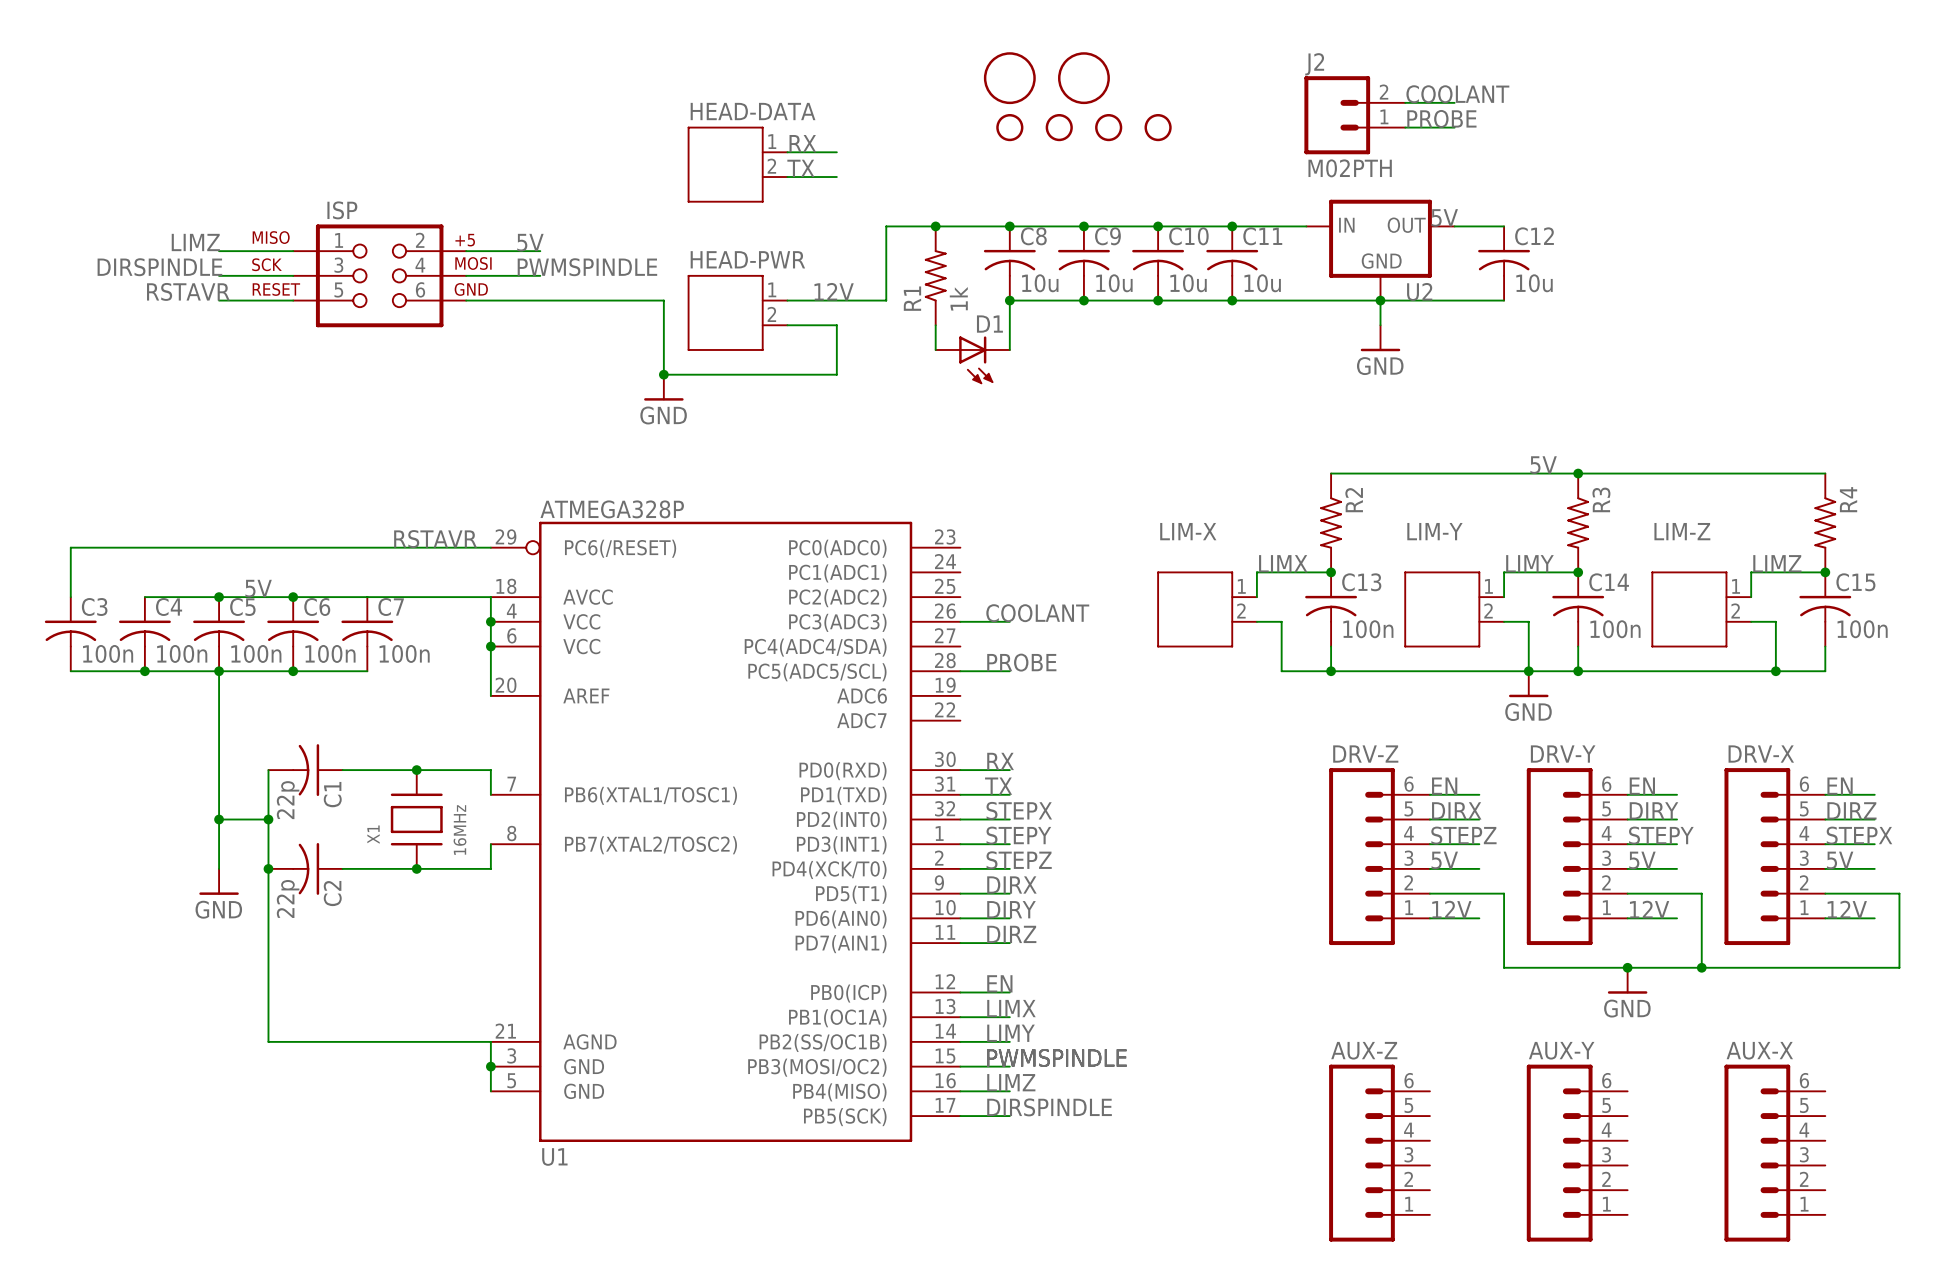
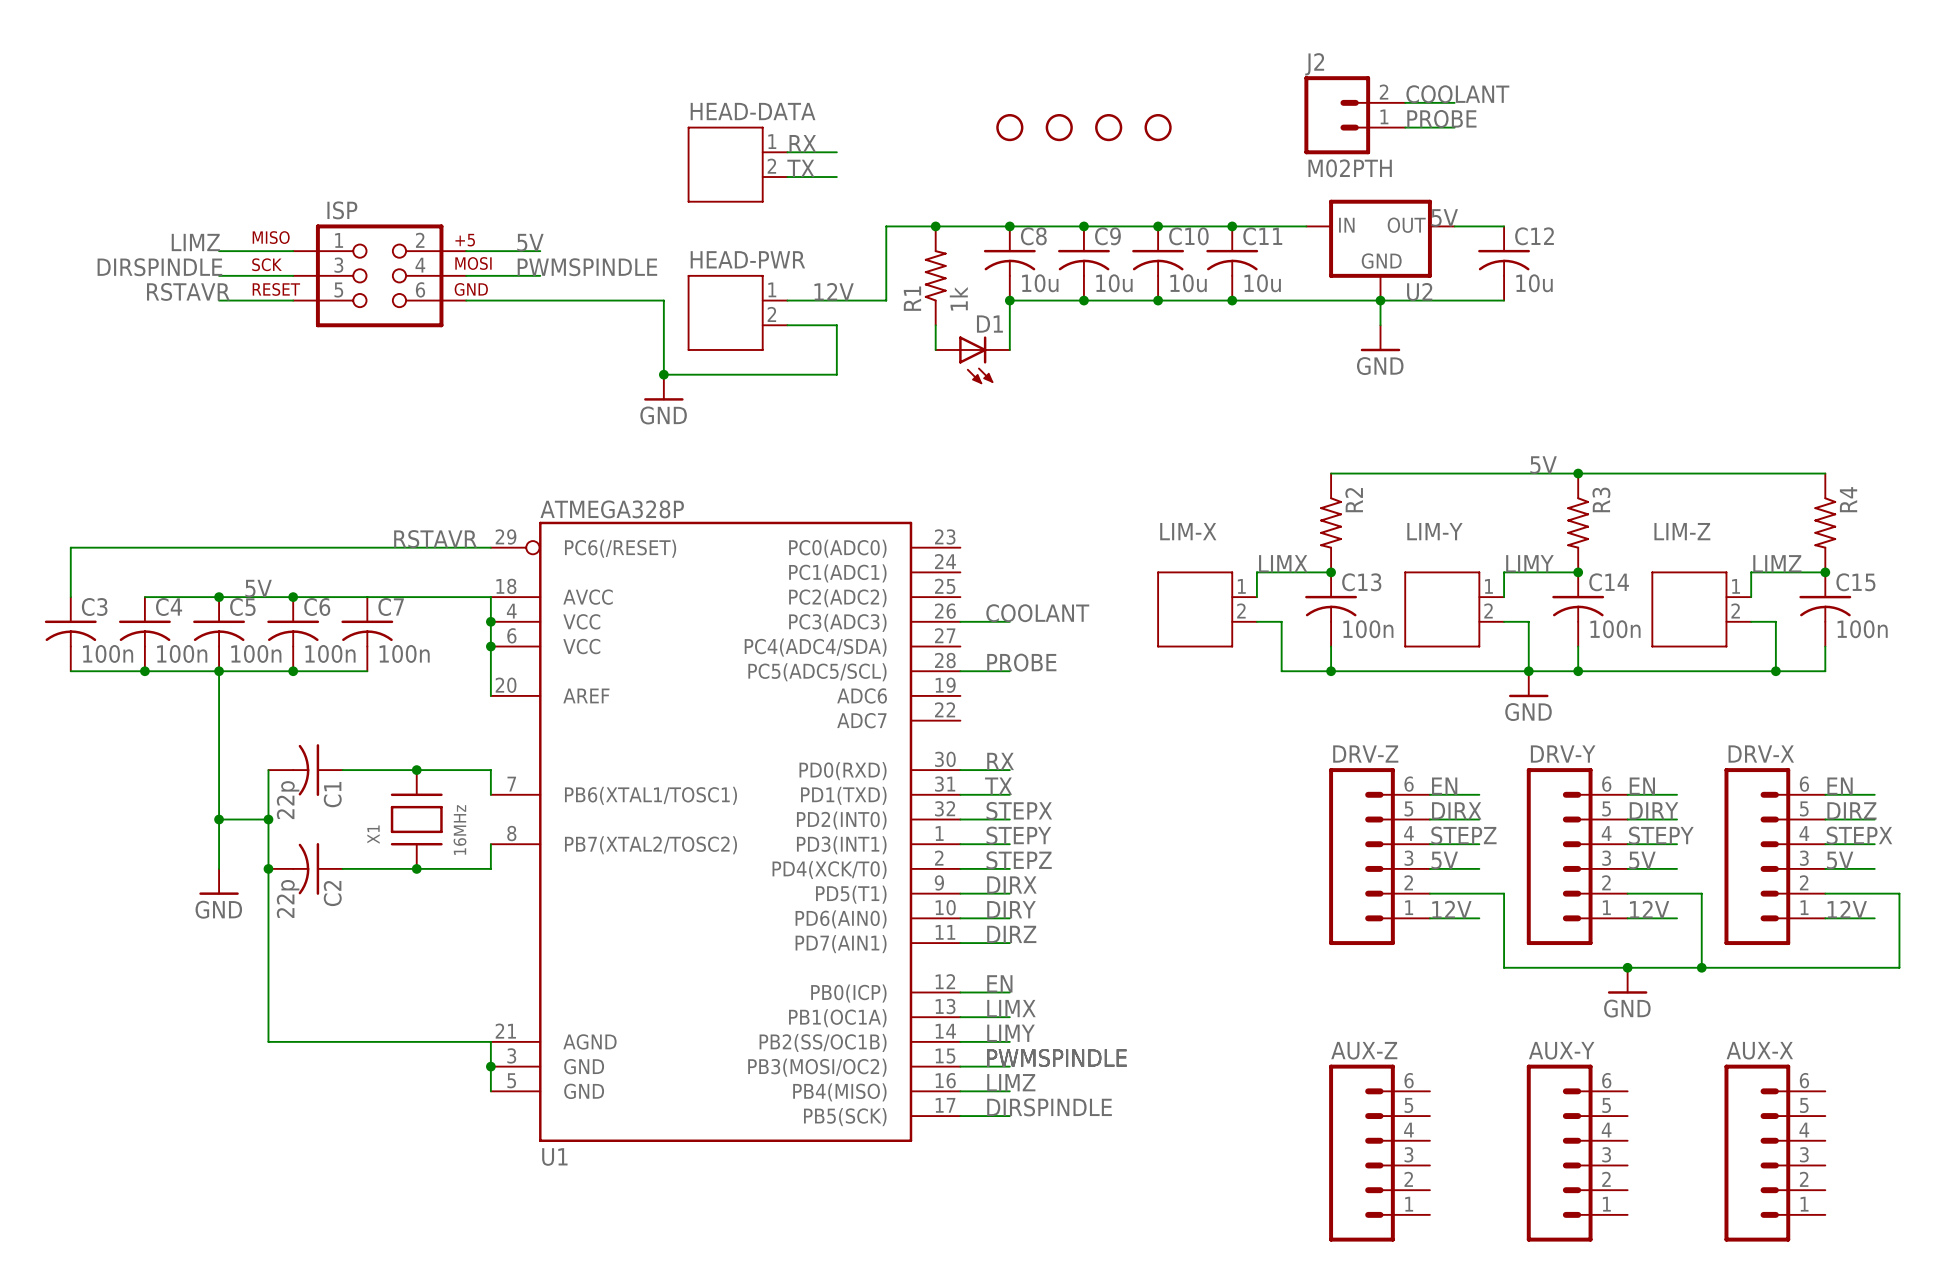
part: (1009, 78) -> none
part: (1083, 78) -> none

